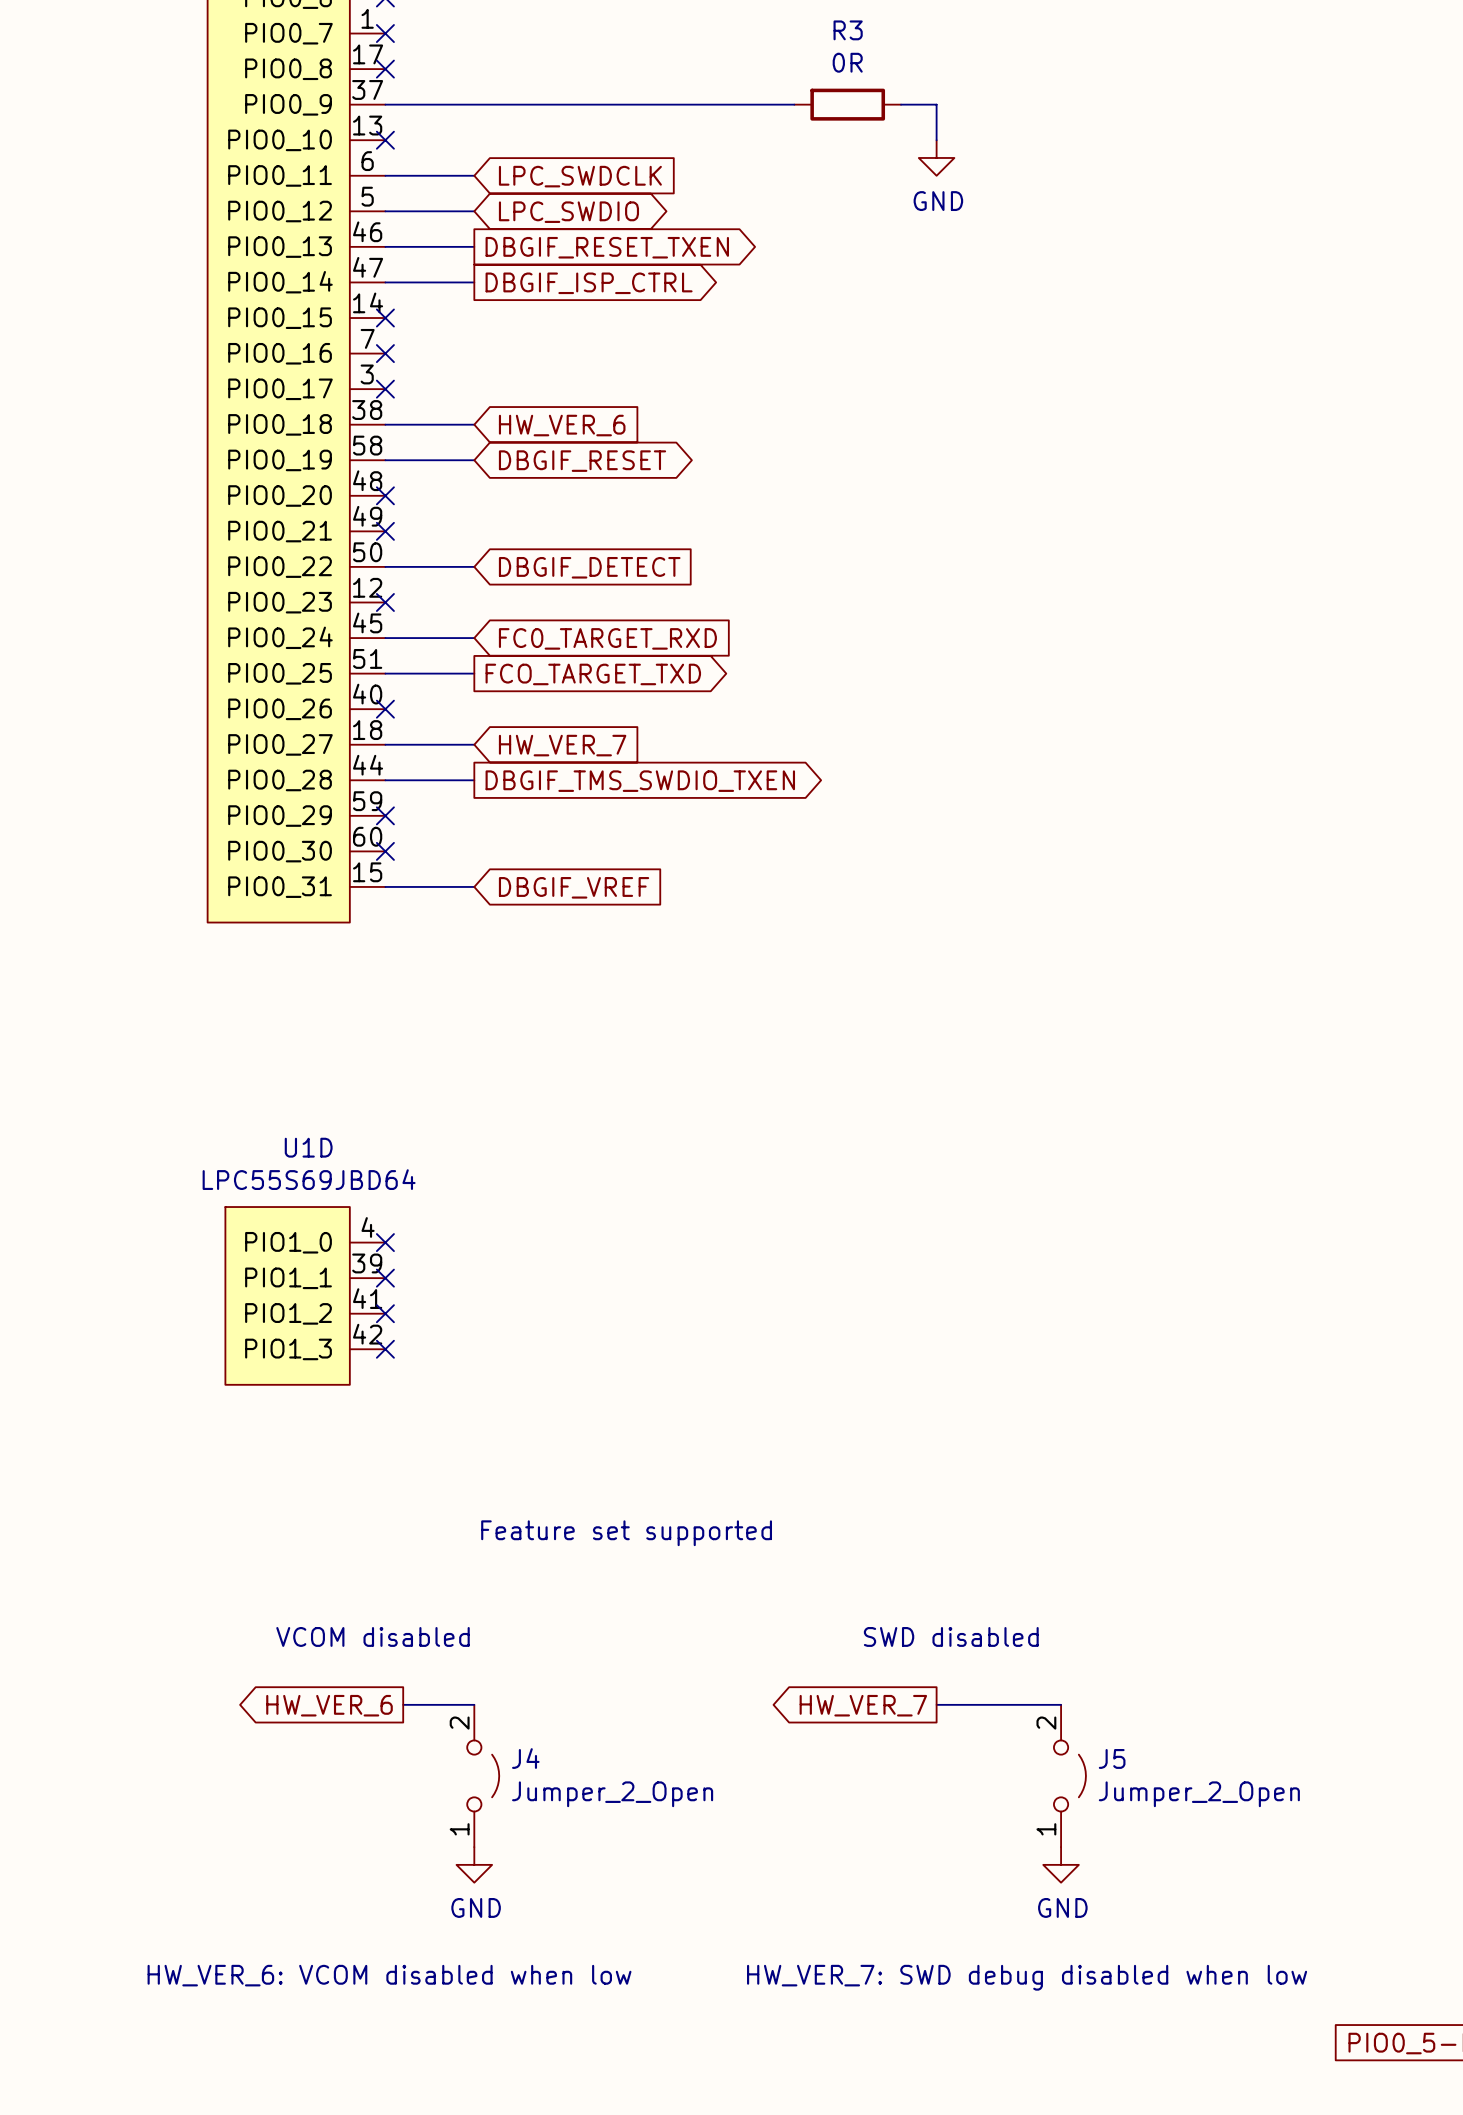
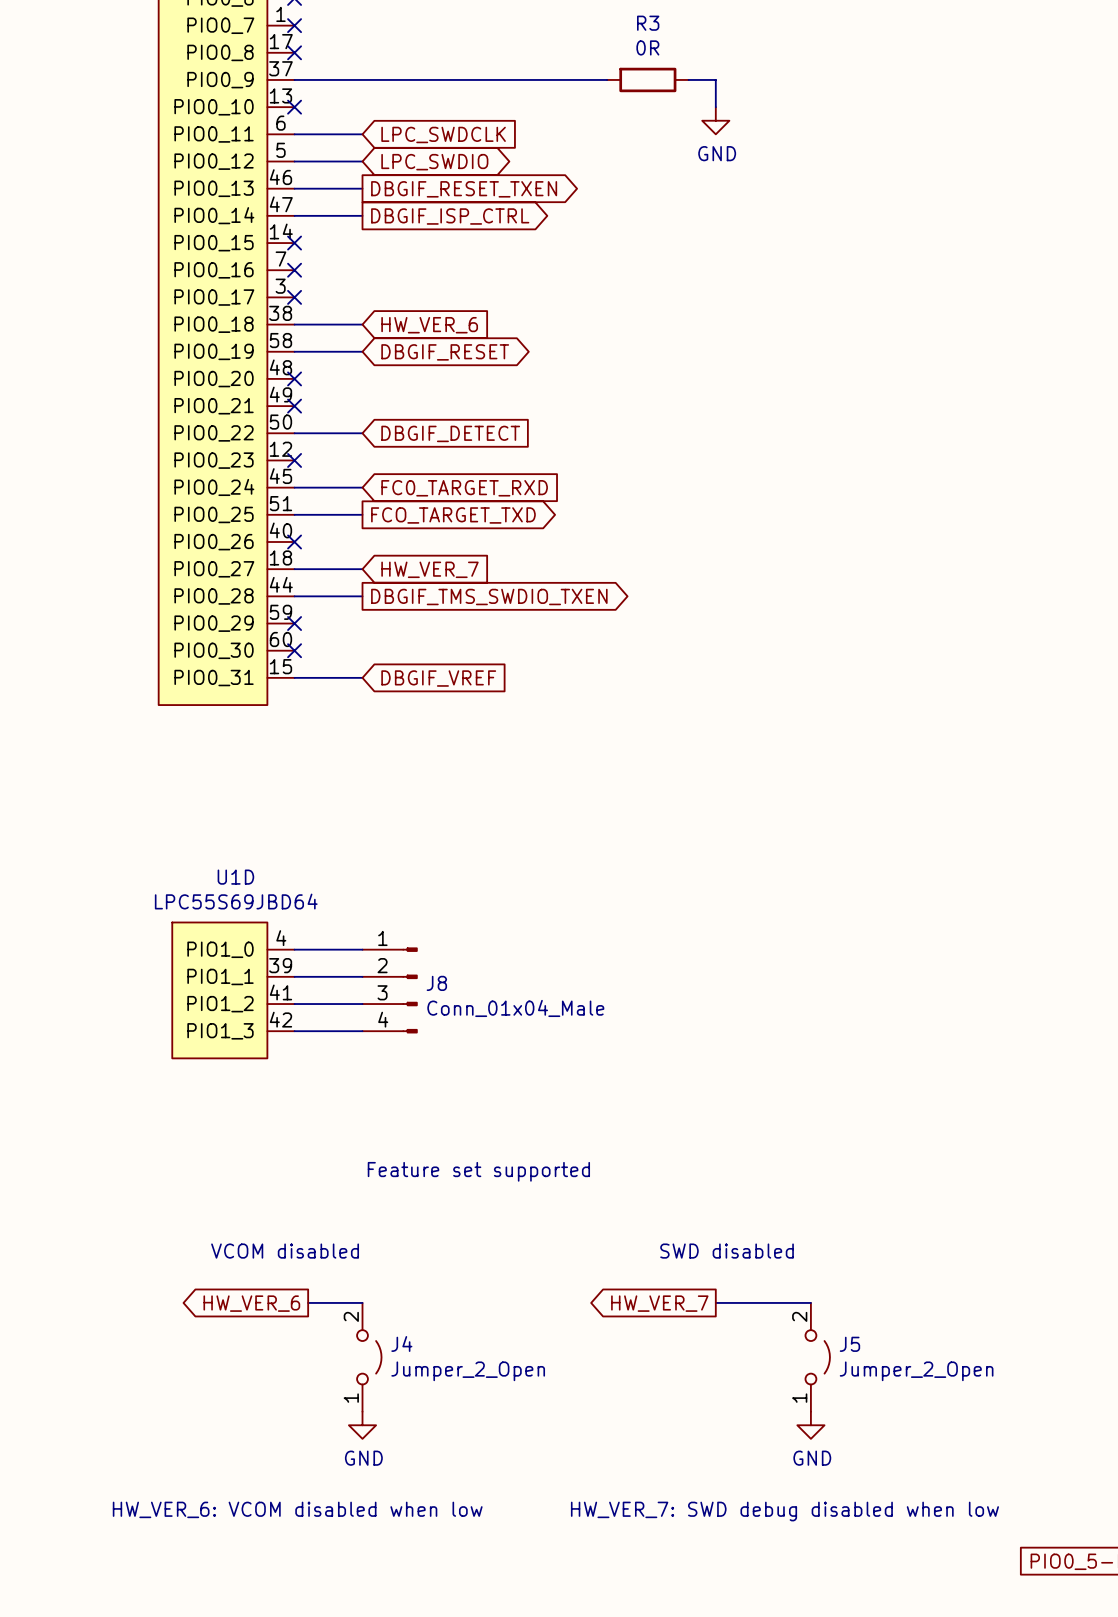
wire: none -> (294, 949) (362, 949)
no-connect mark: (385, 1242) -> none
wire: none -> (294, 976) (362, 976)
no-connect mark: (385, 1278) -> none
J8: none -> Conn_01x04_Male (390, 990)
wire: none -> (294, 1004) (362, 1004)
no-connect mark: (385, 1313) -> none
wire: none -> (294, 1031) (362, 1031)
no-connect mark: (385, 1349) -> none

